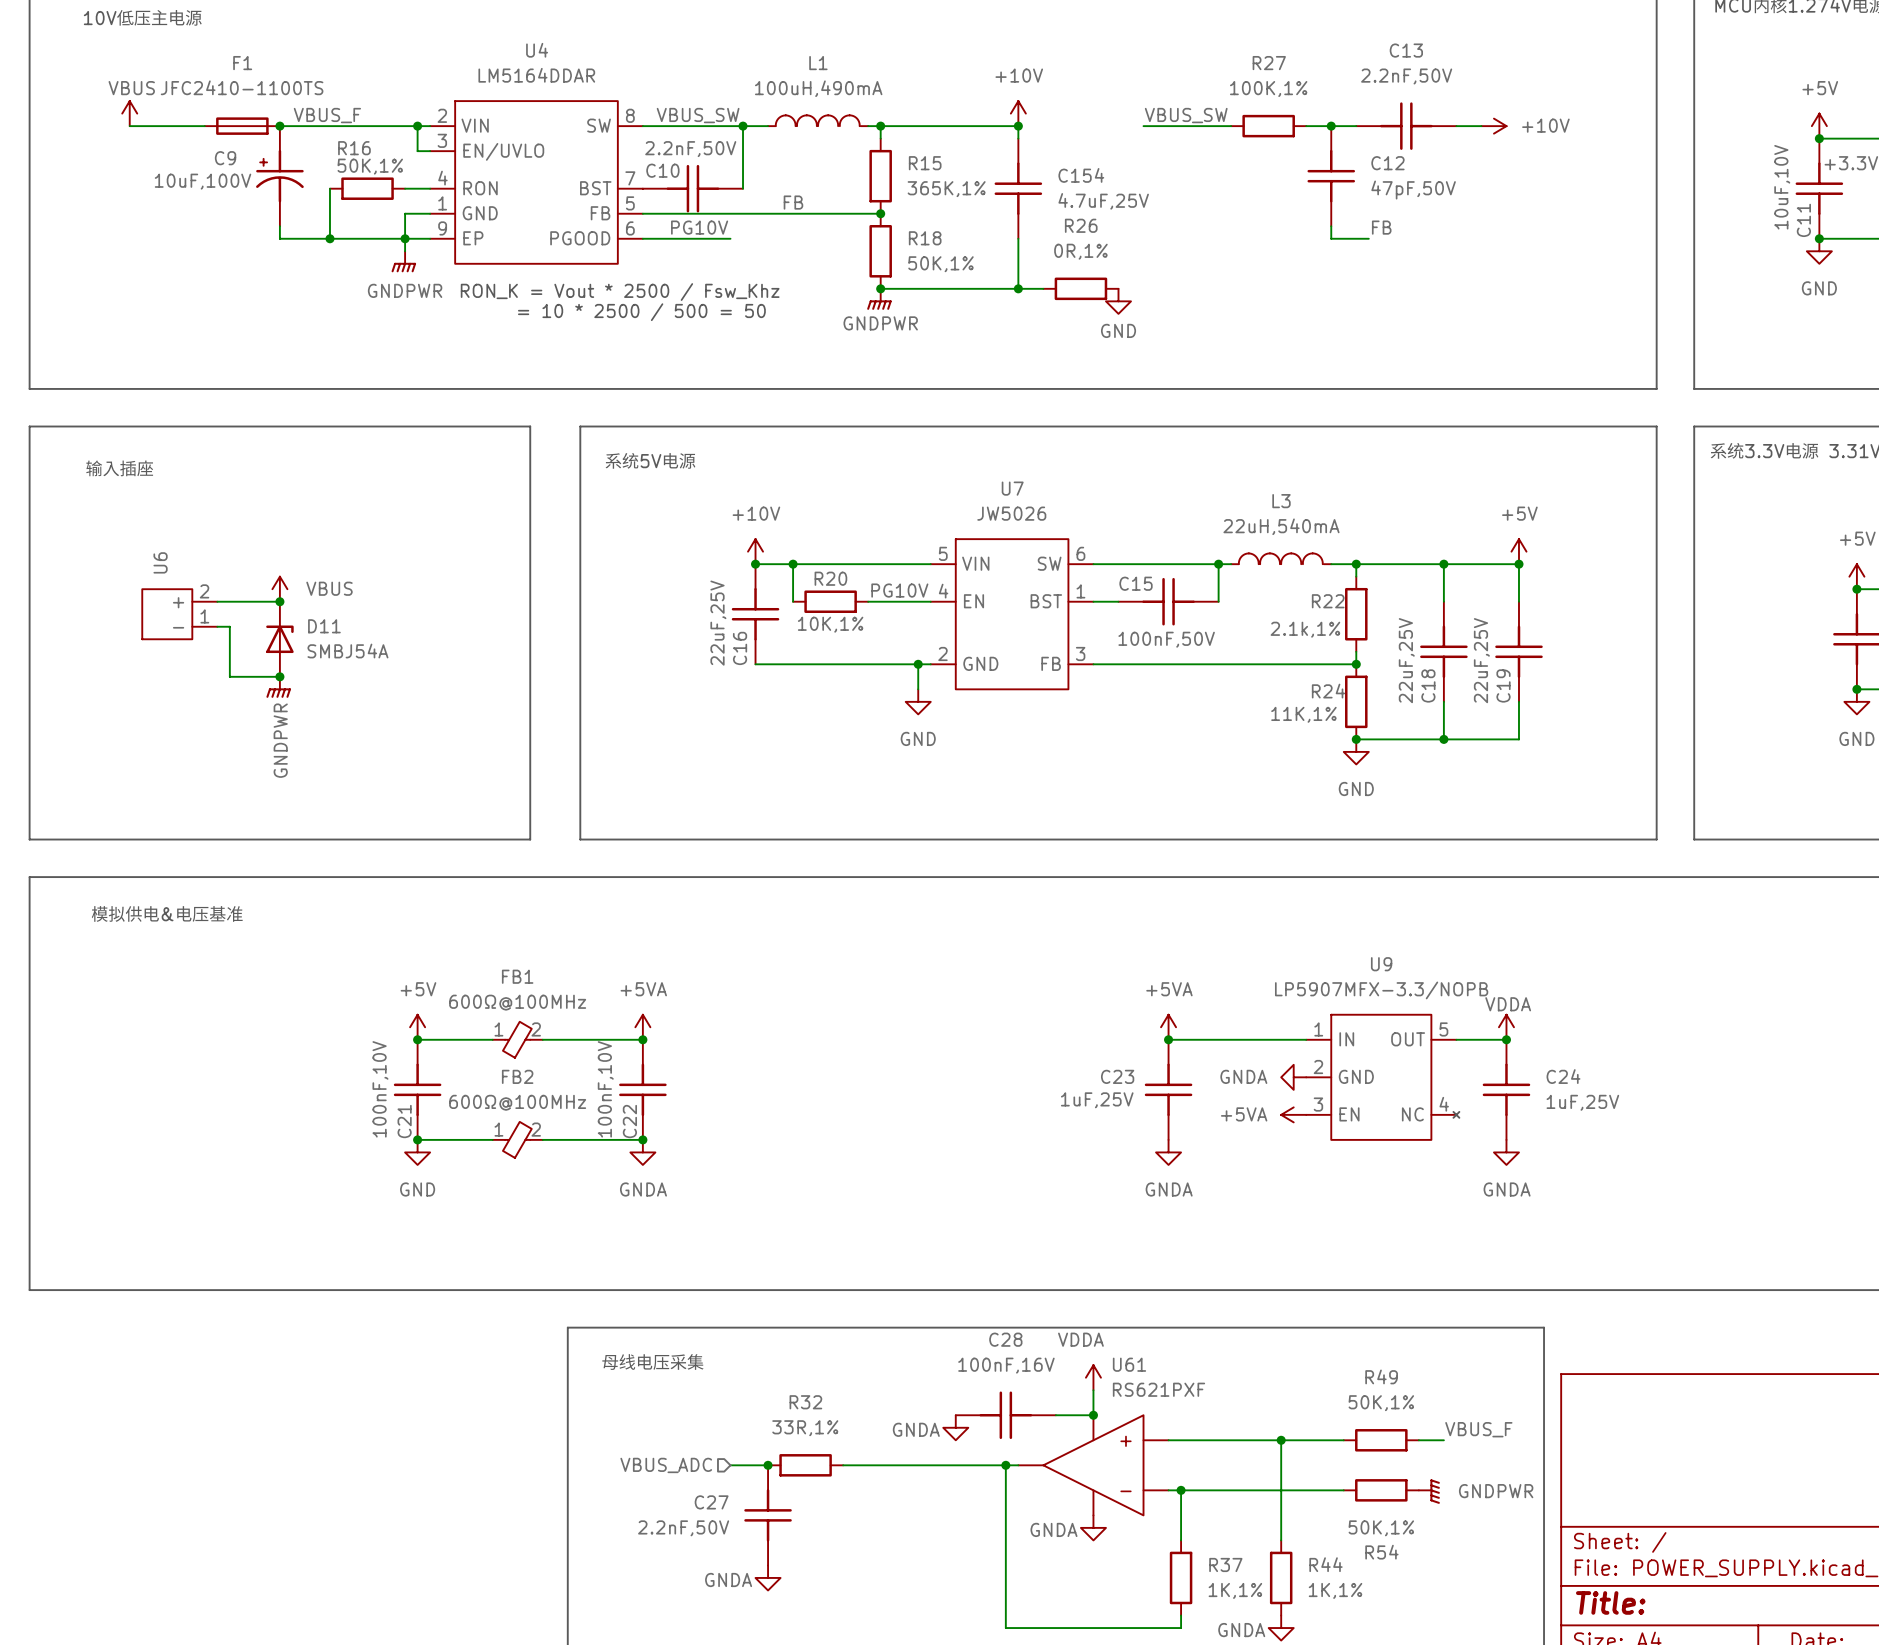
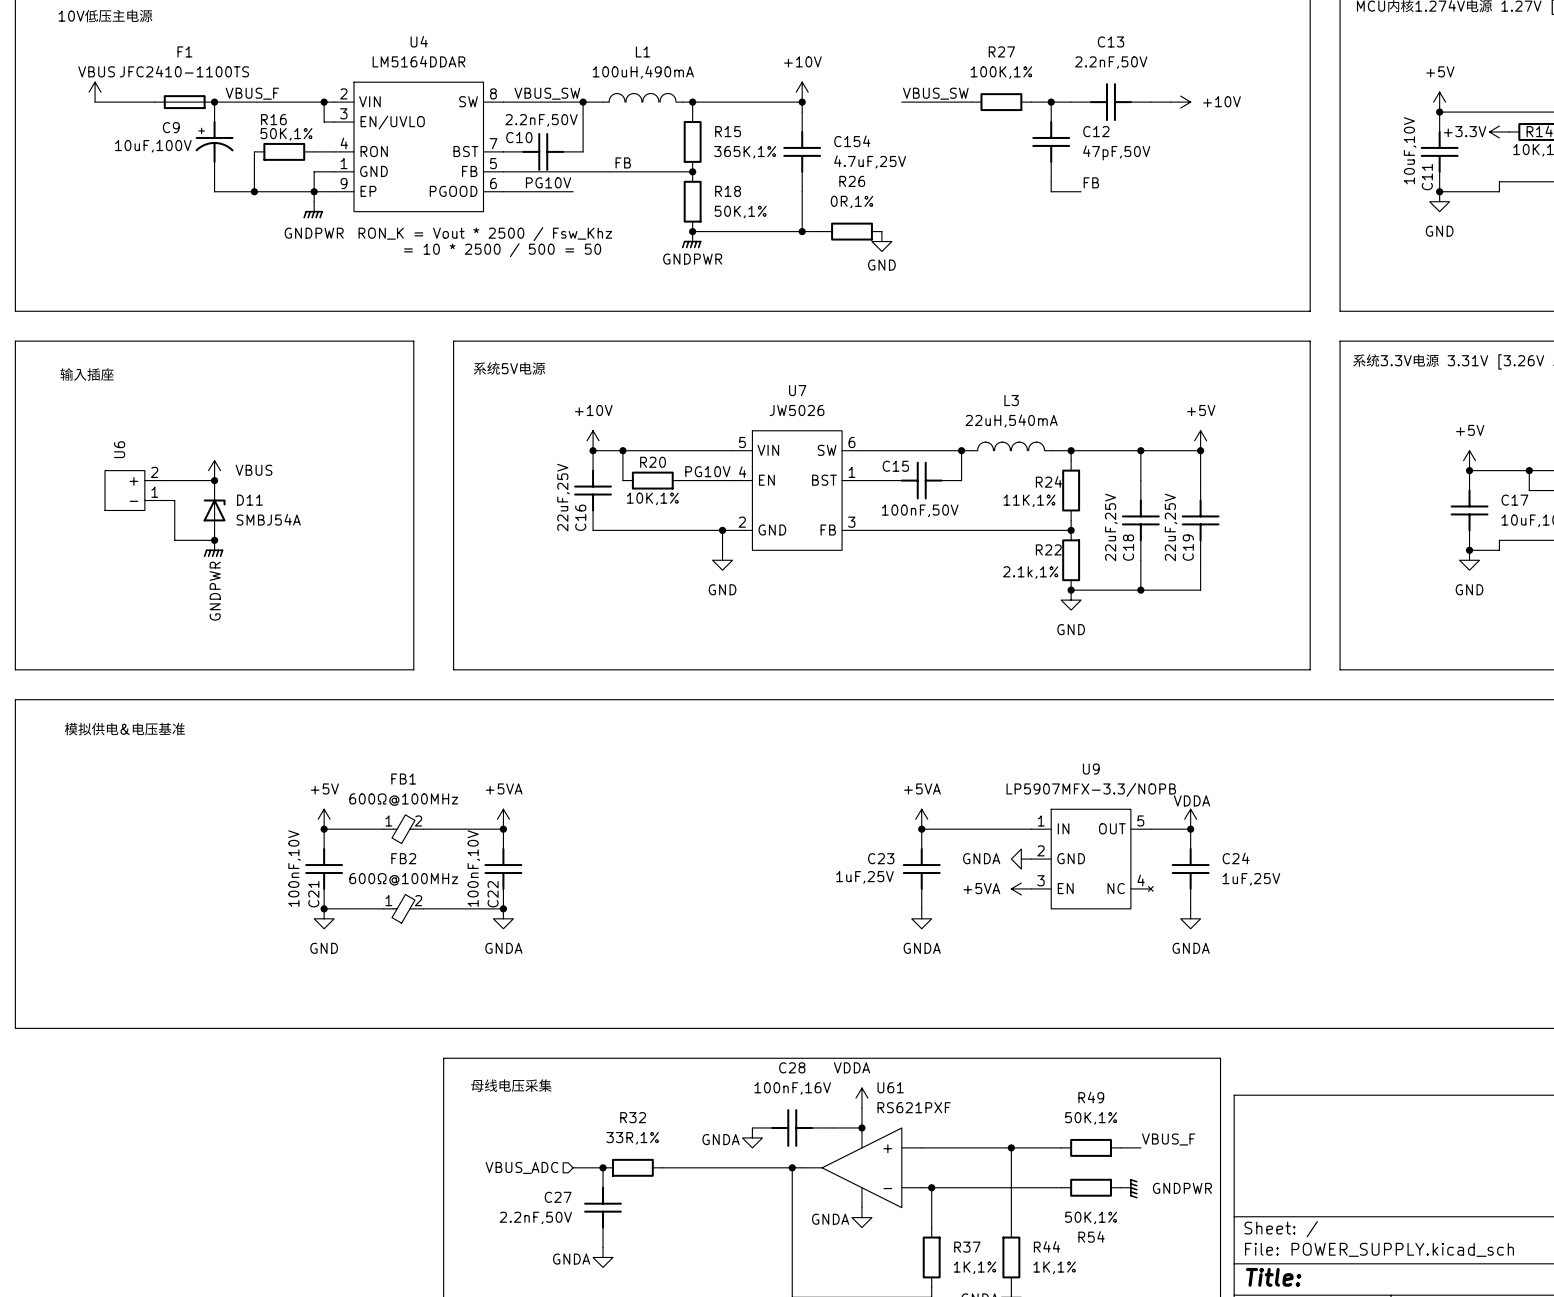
R22 name: R22 (1328, 601) -> R24 (1049, 481)
R22 value: 2.1k,1% (1305, 629) -> 11K,1% (1029, 500)
R24 name: R24 (1328, 691) -> R22 (1048, 549)
R24 value: 11K,1% (1303, 714) -> 2.1k,1% (1030, 572)

